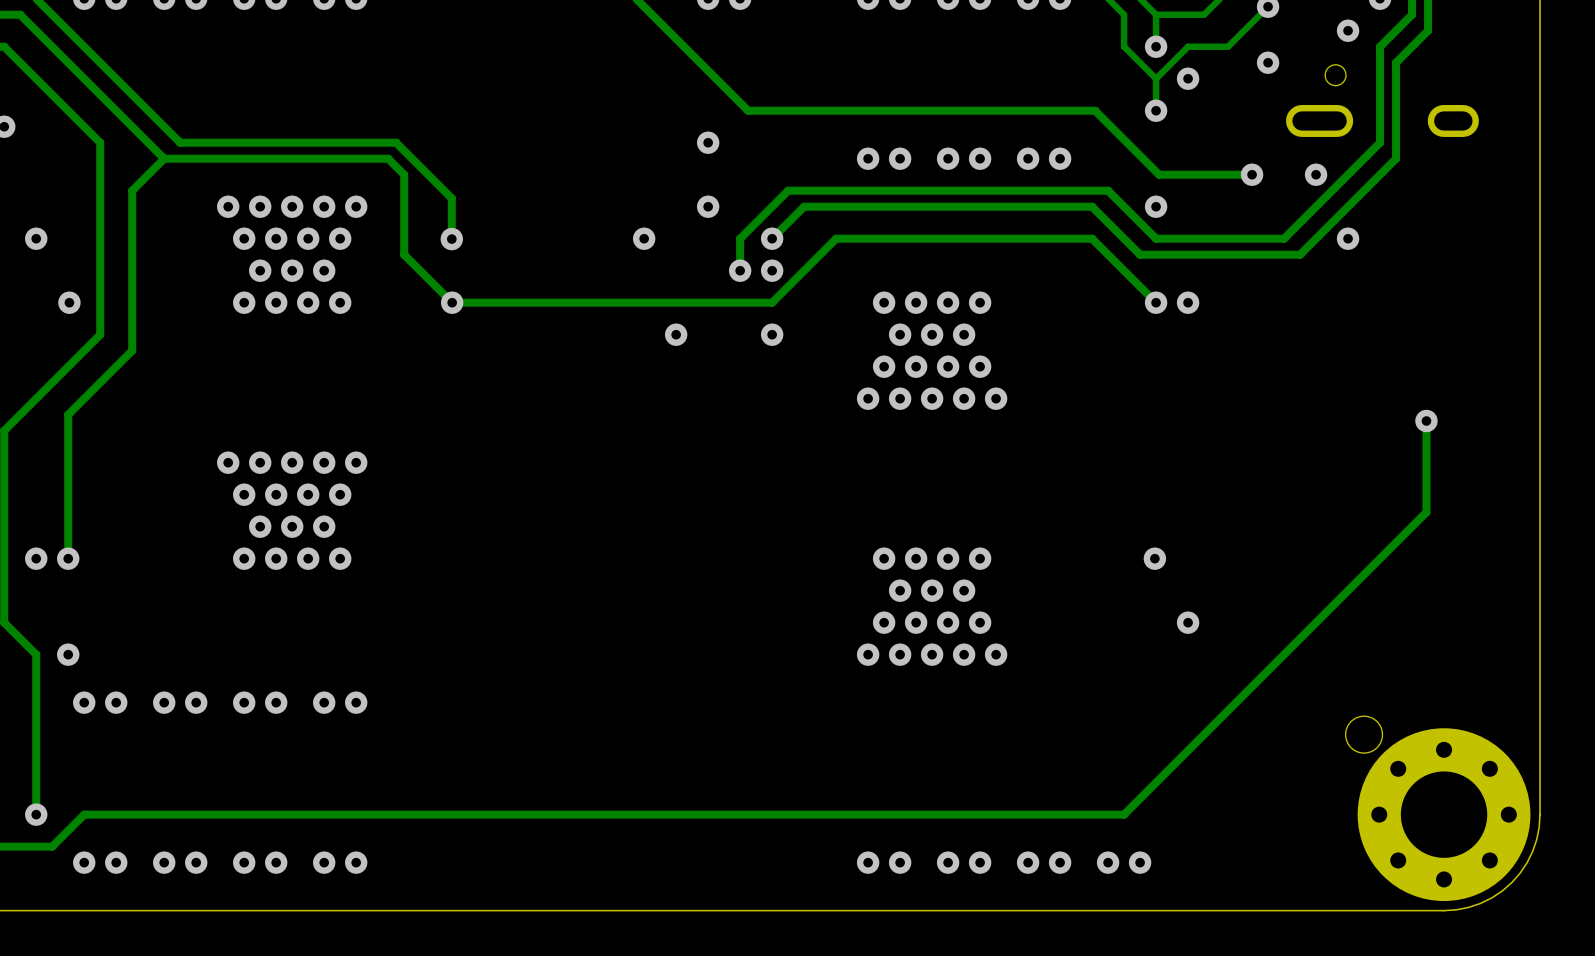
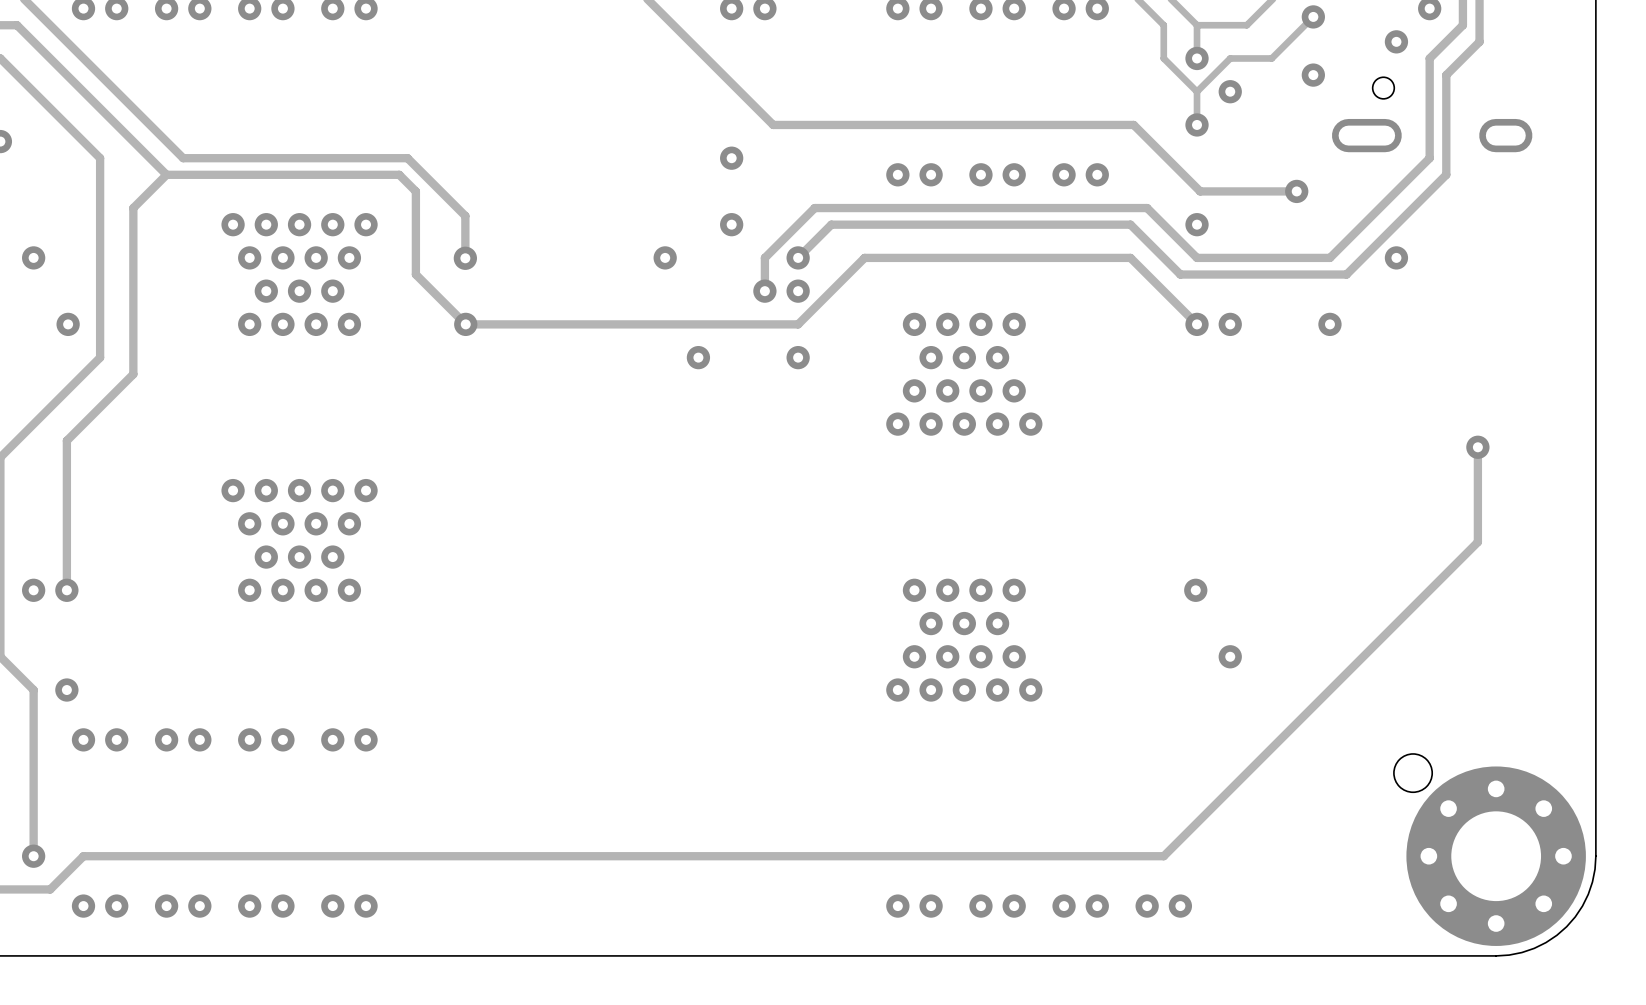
via: (1316, 174) -> none
via: none -> (1329, 324)

